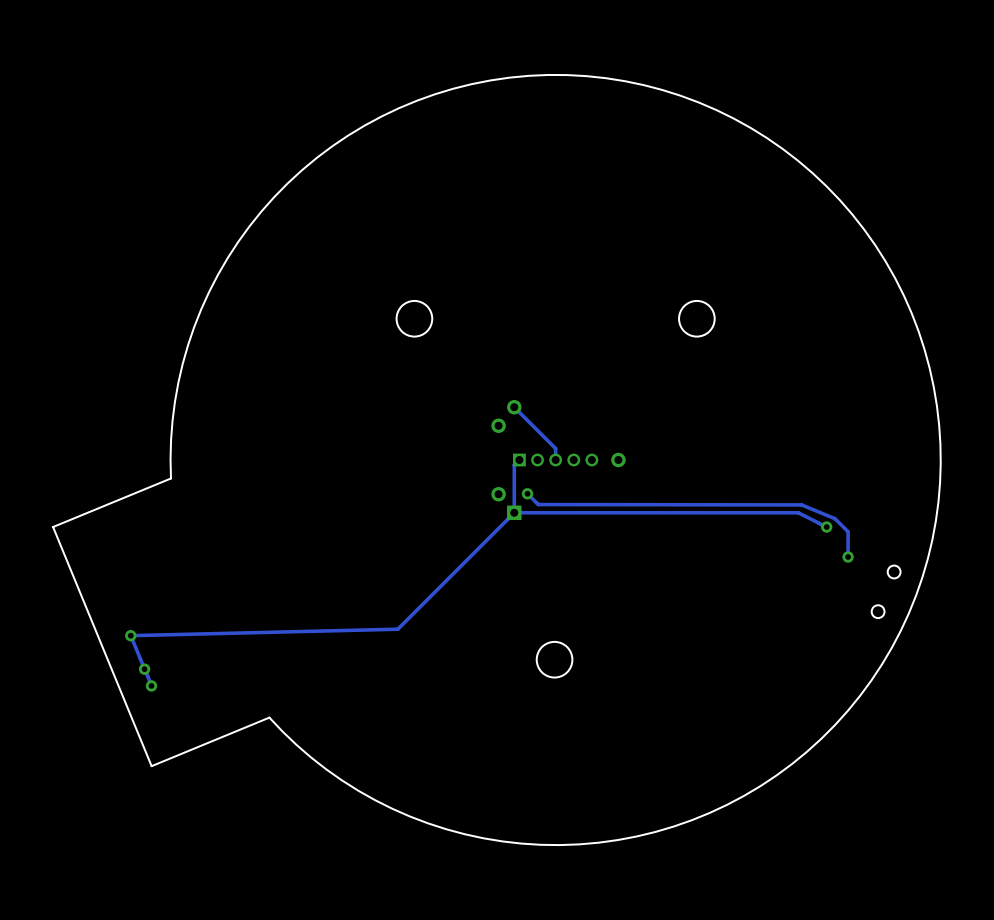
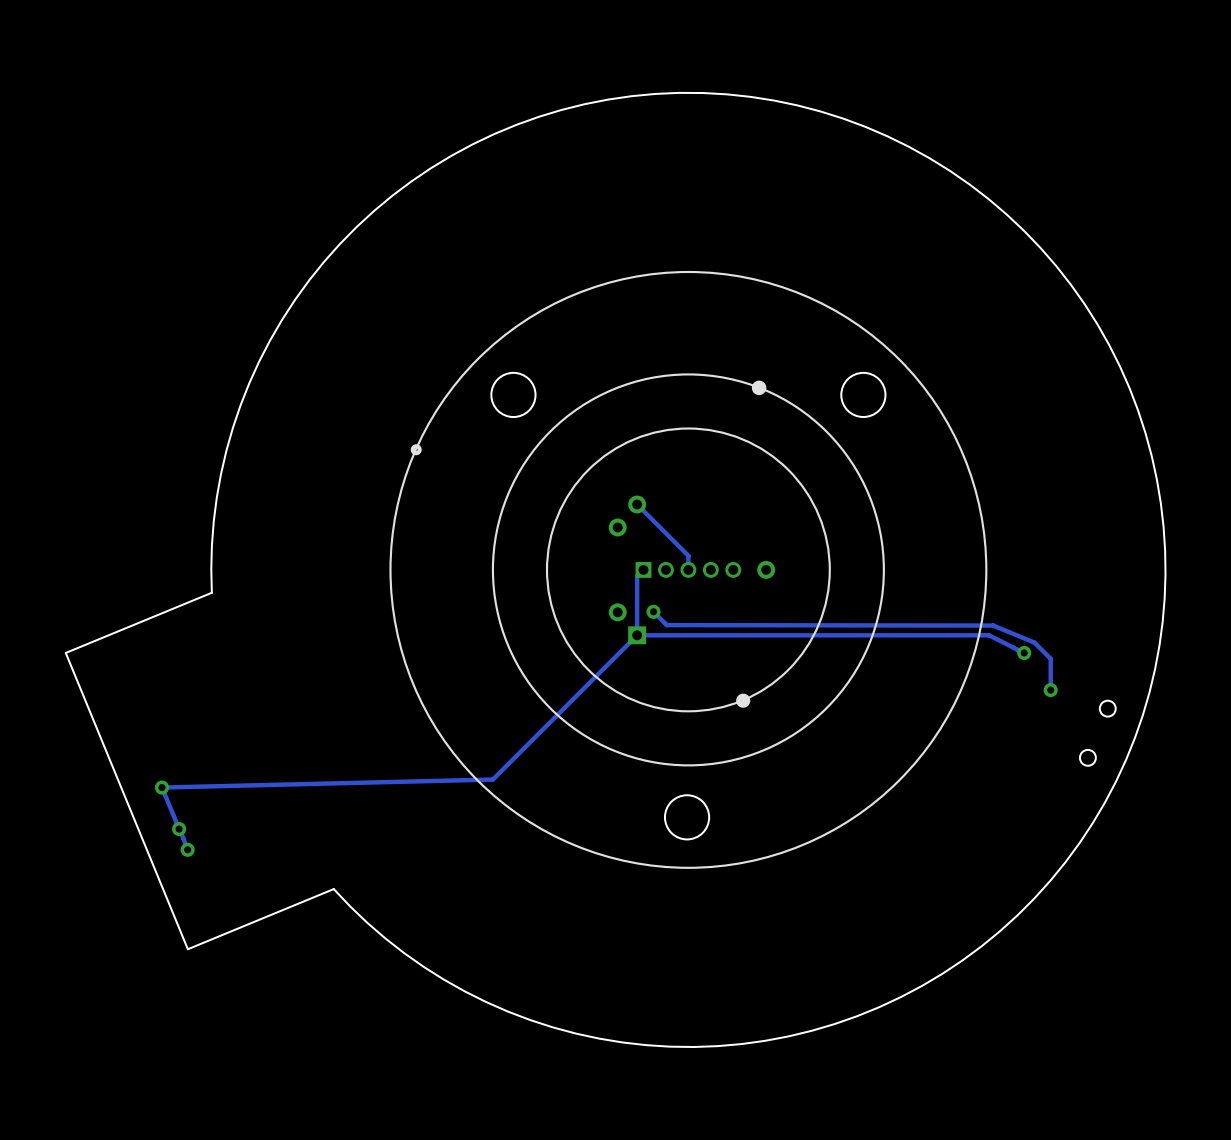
drawing: none -> [389, 270, 988, 869]

